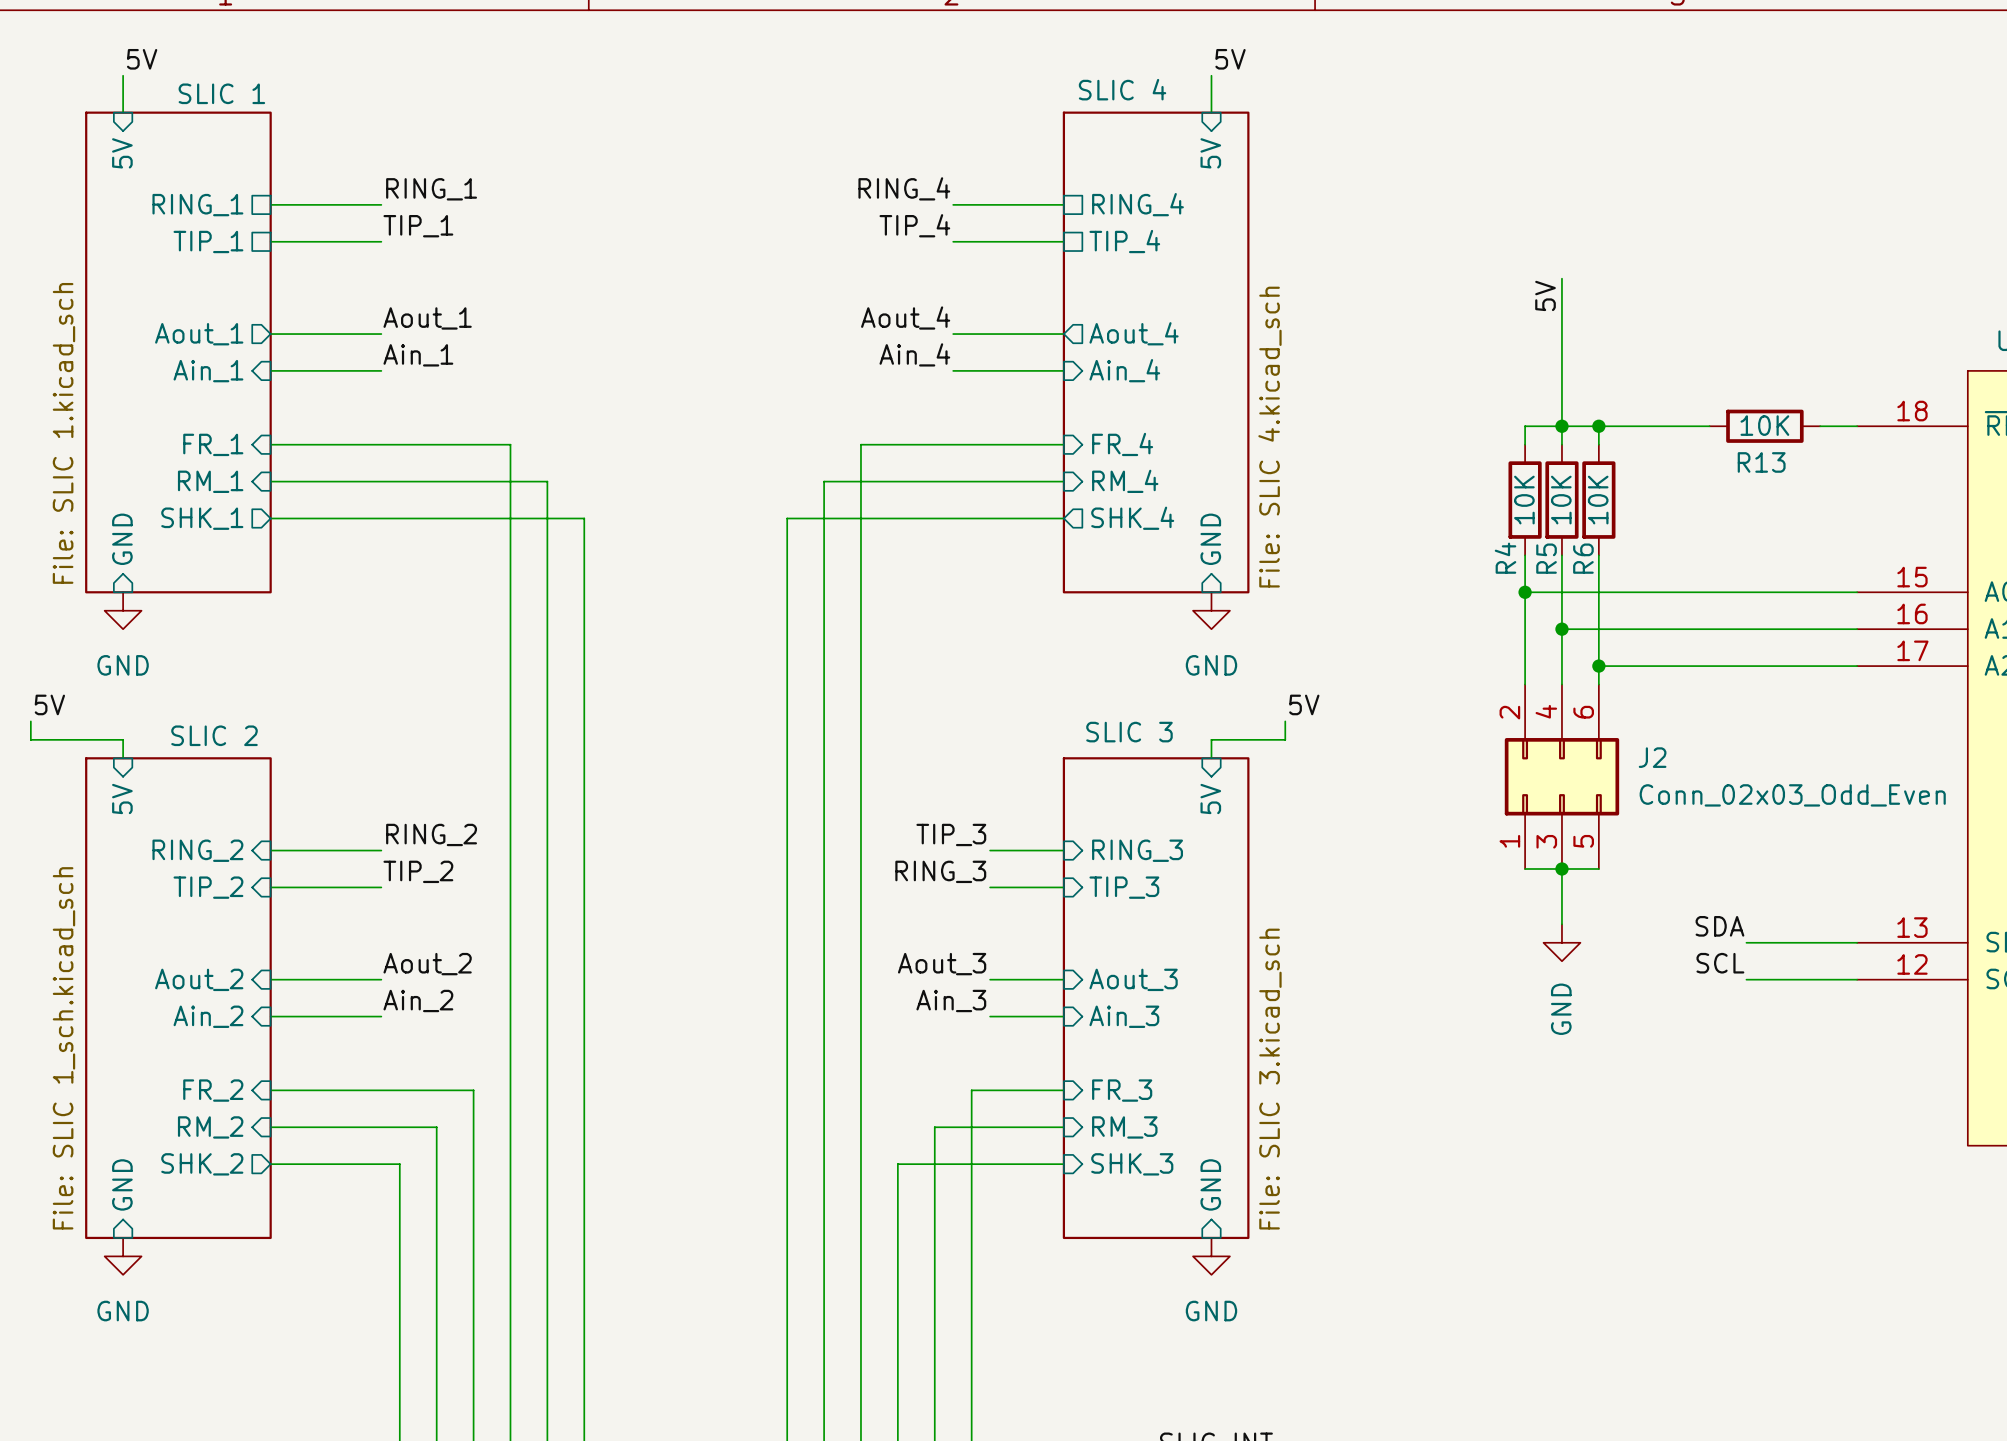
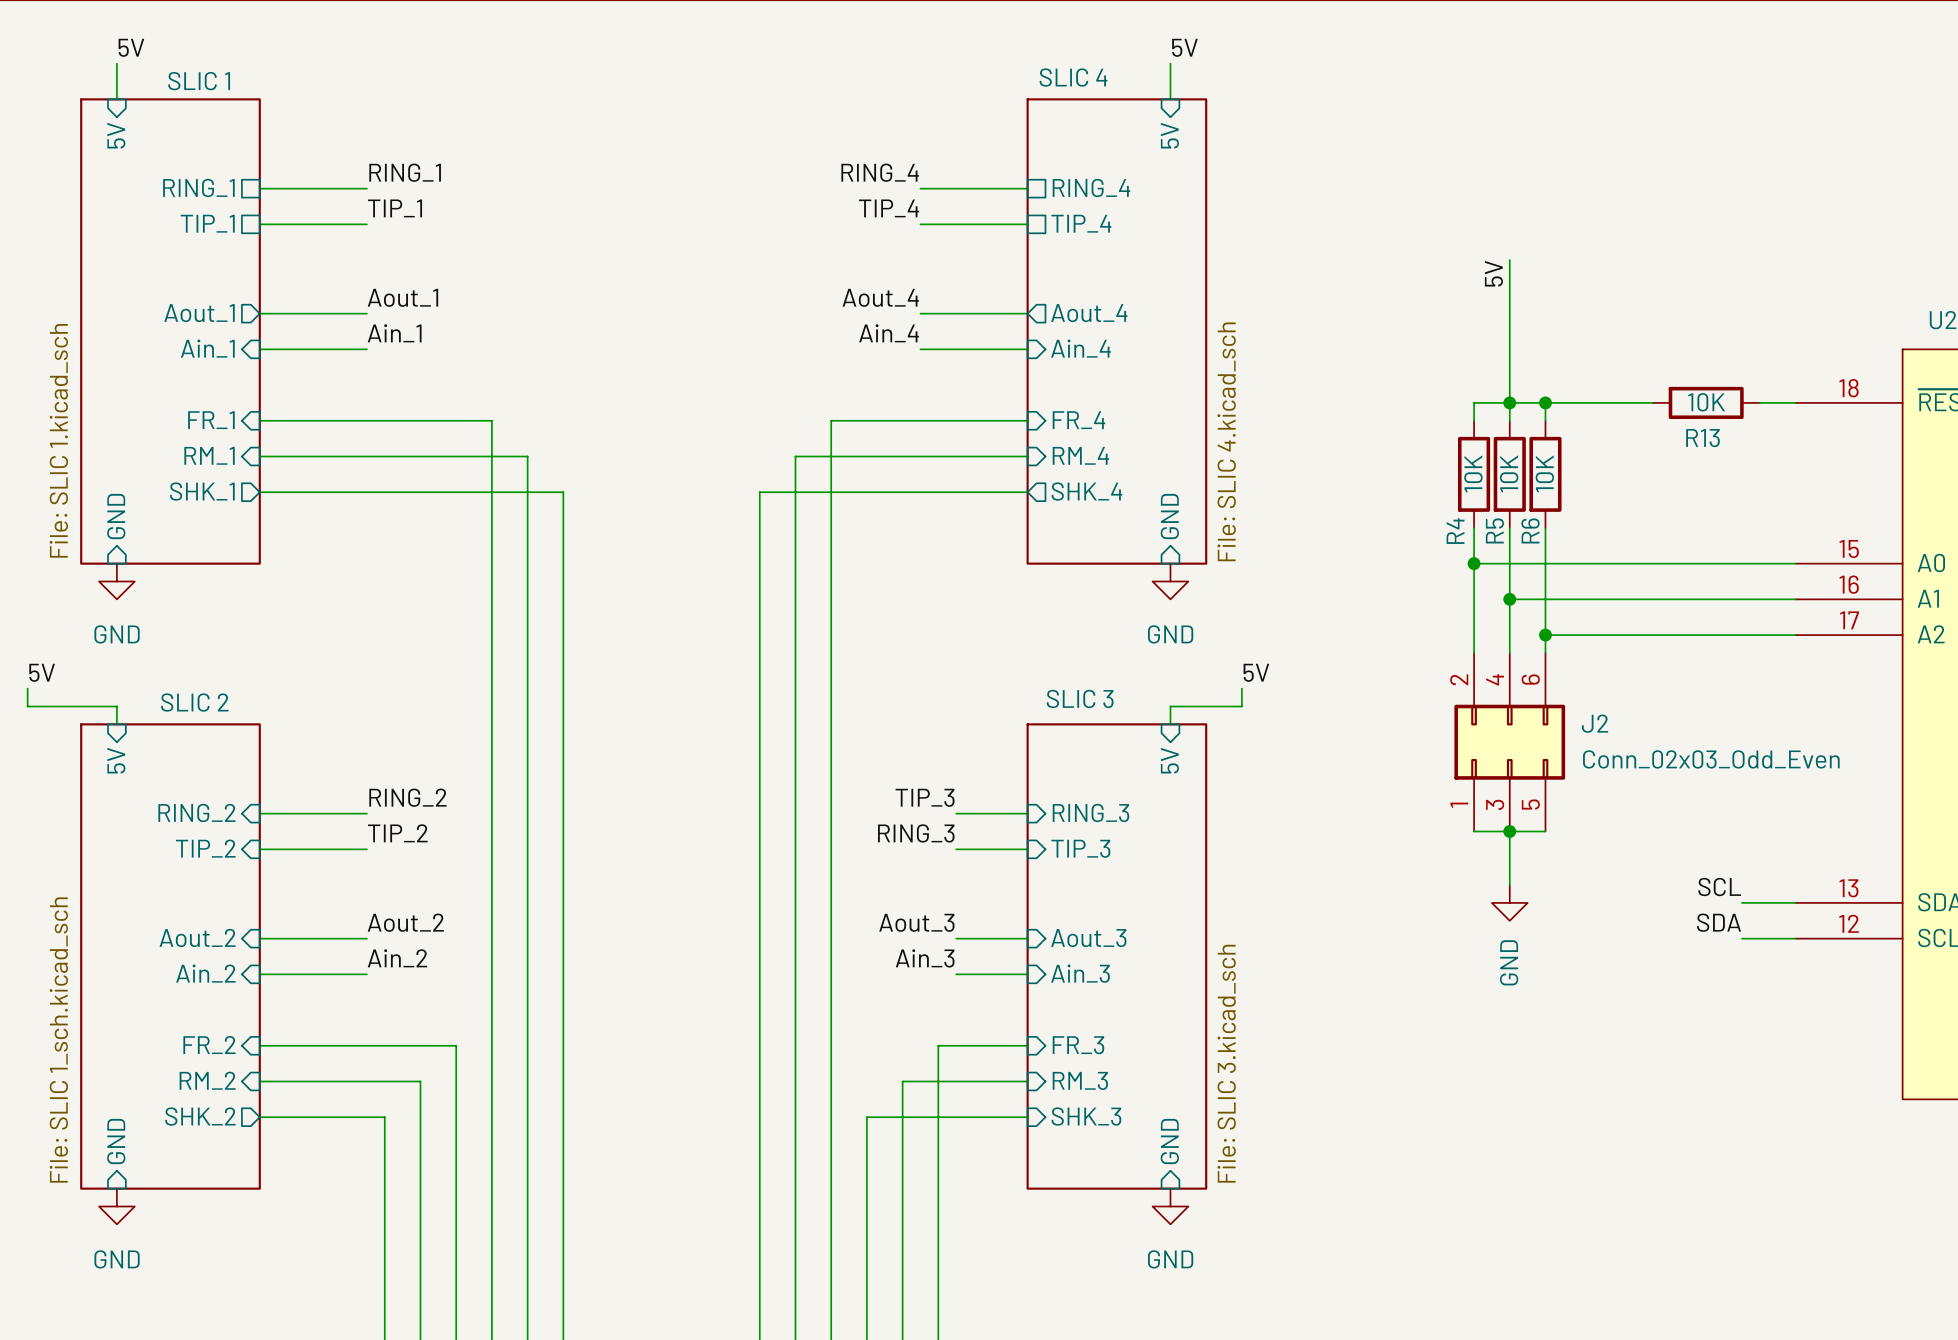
label position: SDA (1719, 926) -> SDA (1719, 922)
wire: (1746, 942) (1801, 942) -> none
label position: SCL (1720, 963) -> SCL (1719, 887)
wire: (1746, 979) (1801, 979) -> none

